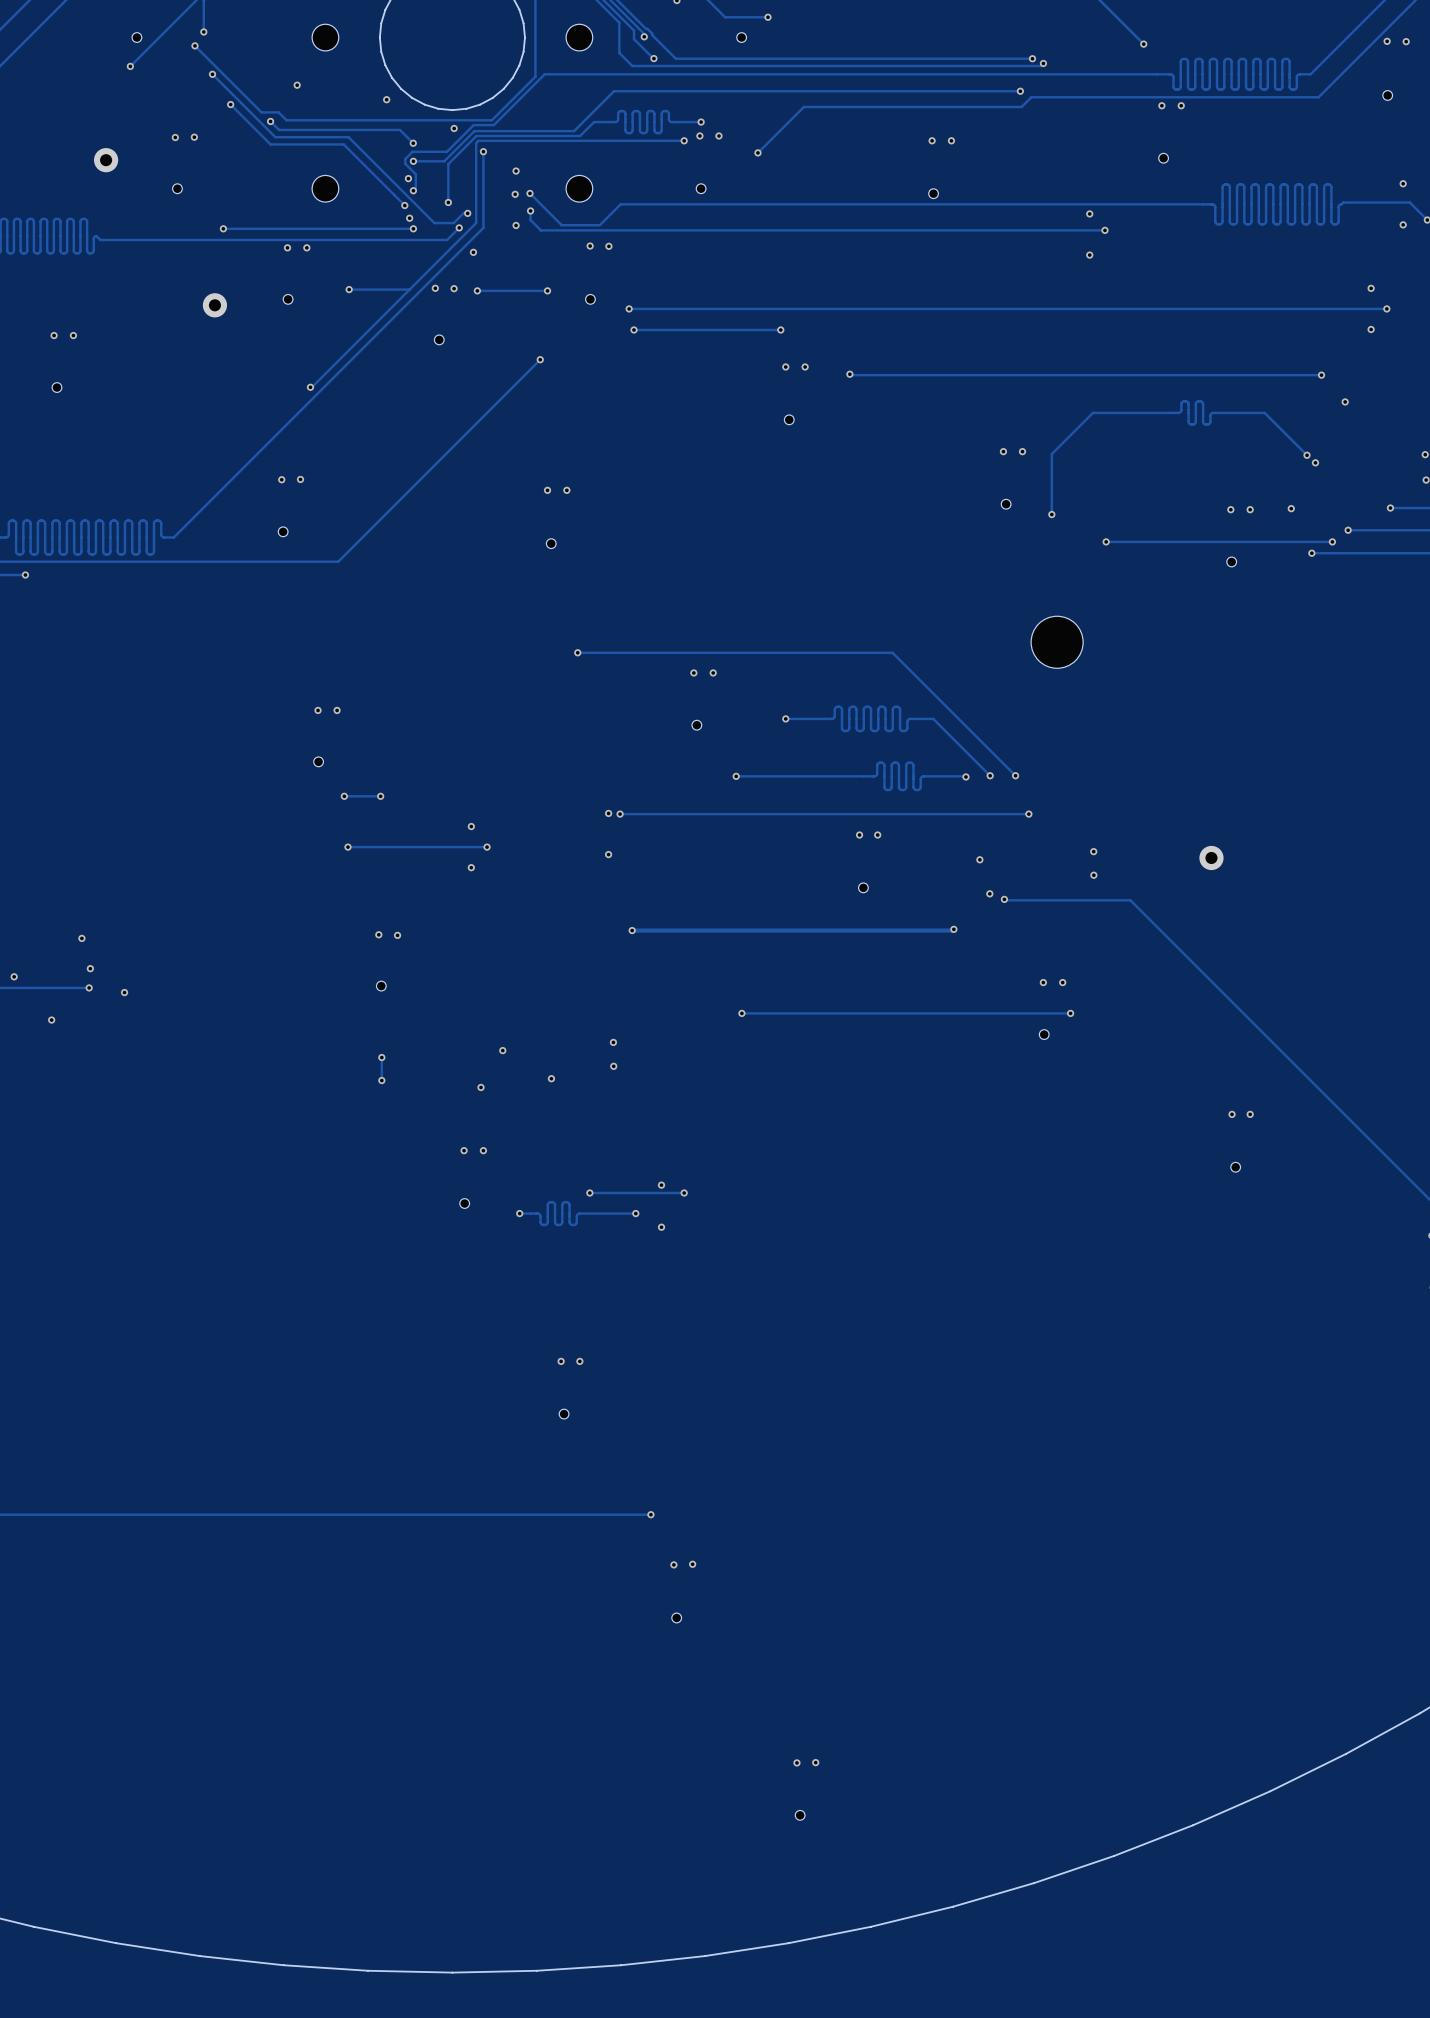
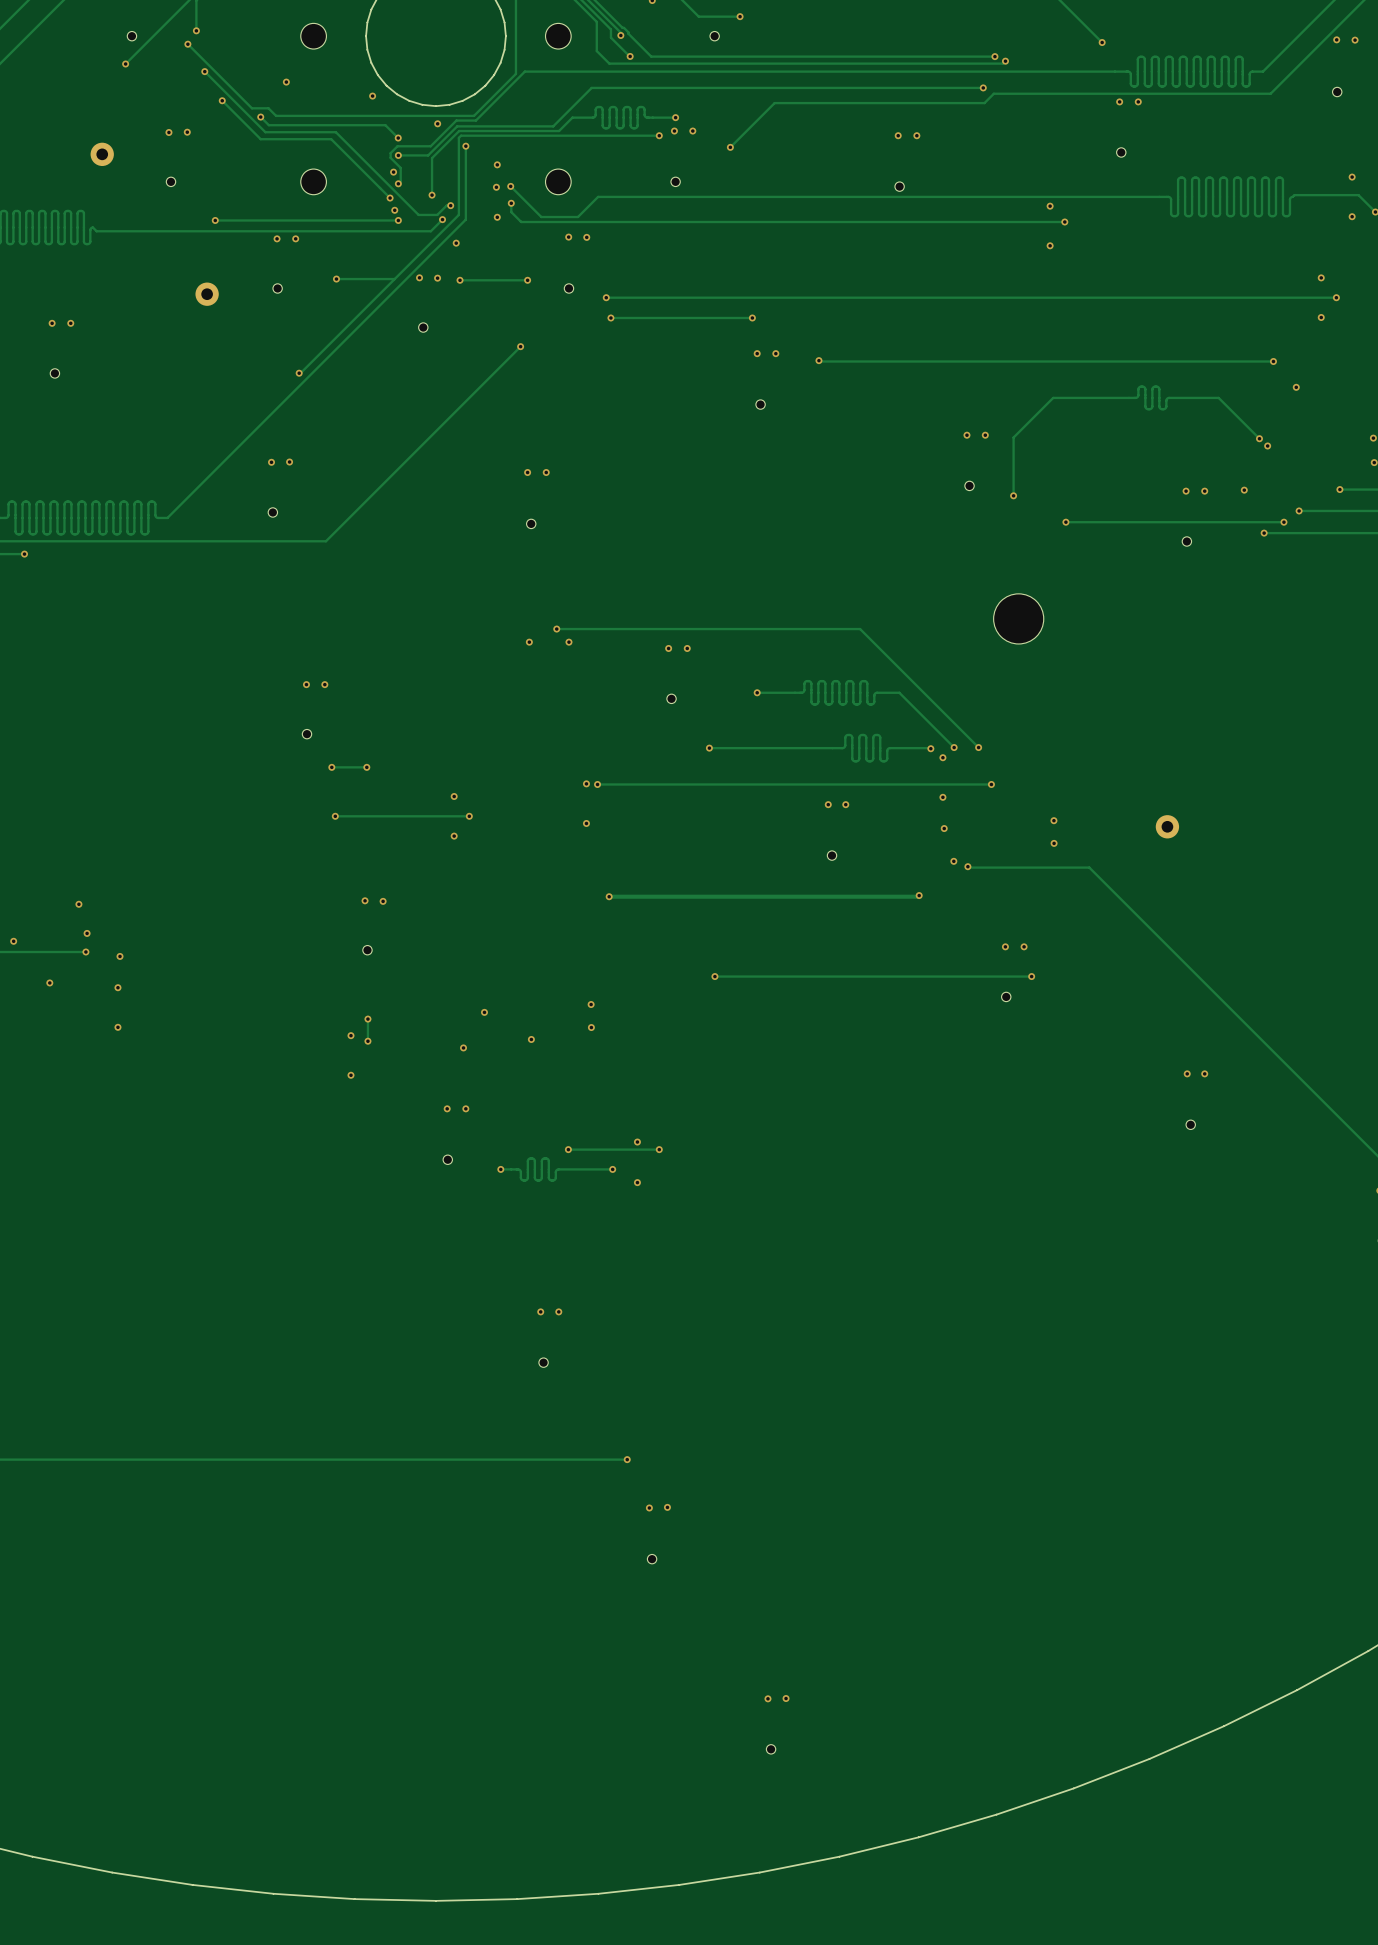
via: none -> (529, 642)
via: none -> (568, 642)
via: none -> (942, 757)
via: none -> (942, 797)
via: none -> (117, 987)
via: none -> (117, 1027)
via: none -> (350, 1035)
via: none -> (350, 1075)

